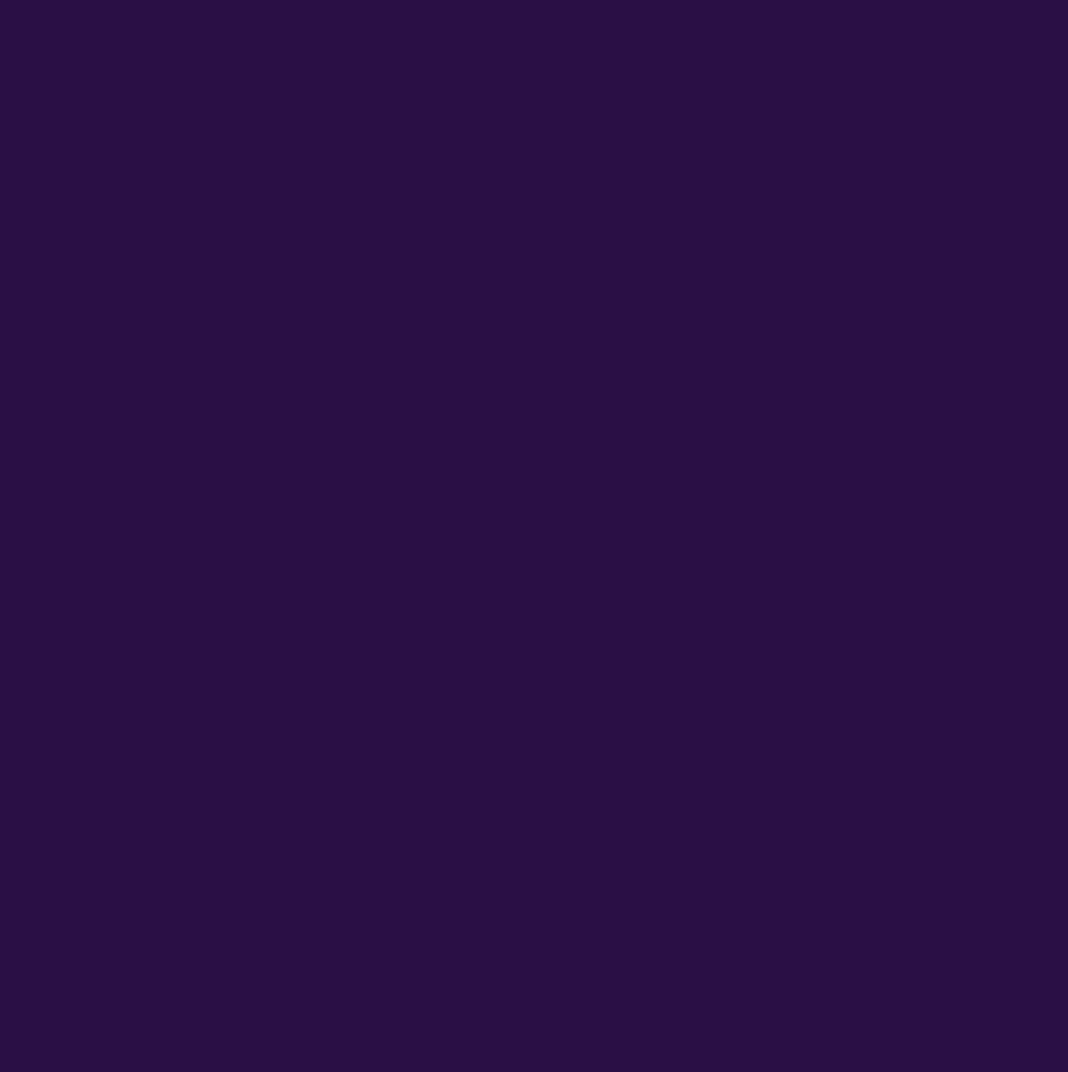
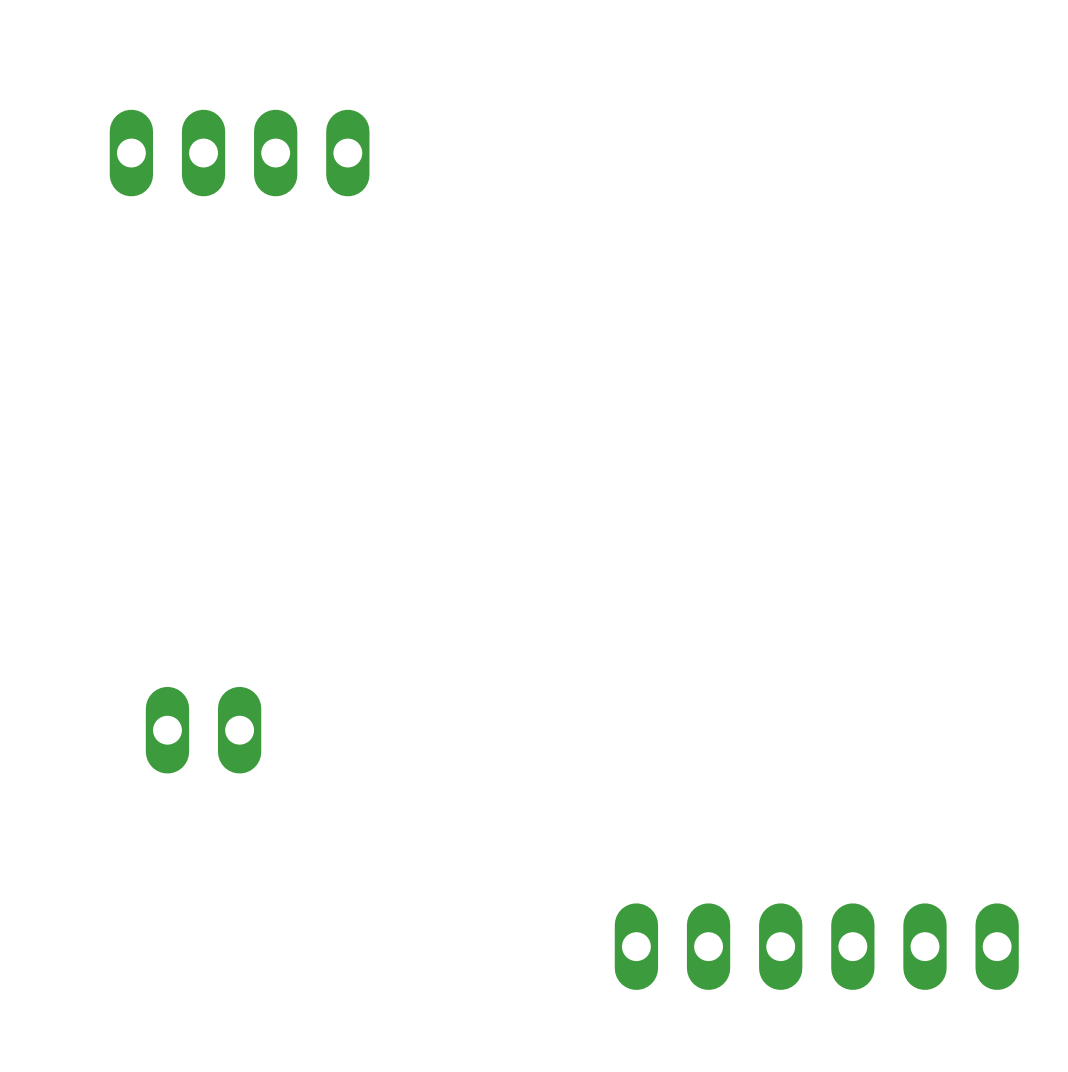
part: none -> (239, 153)
part: none -> (203, 730)
part: none -> (816, 946)

